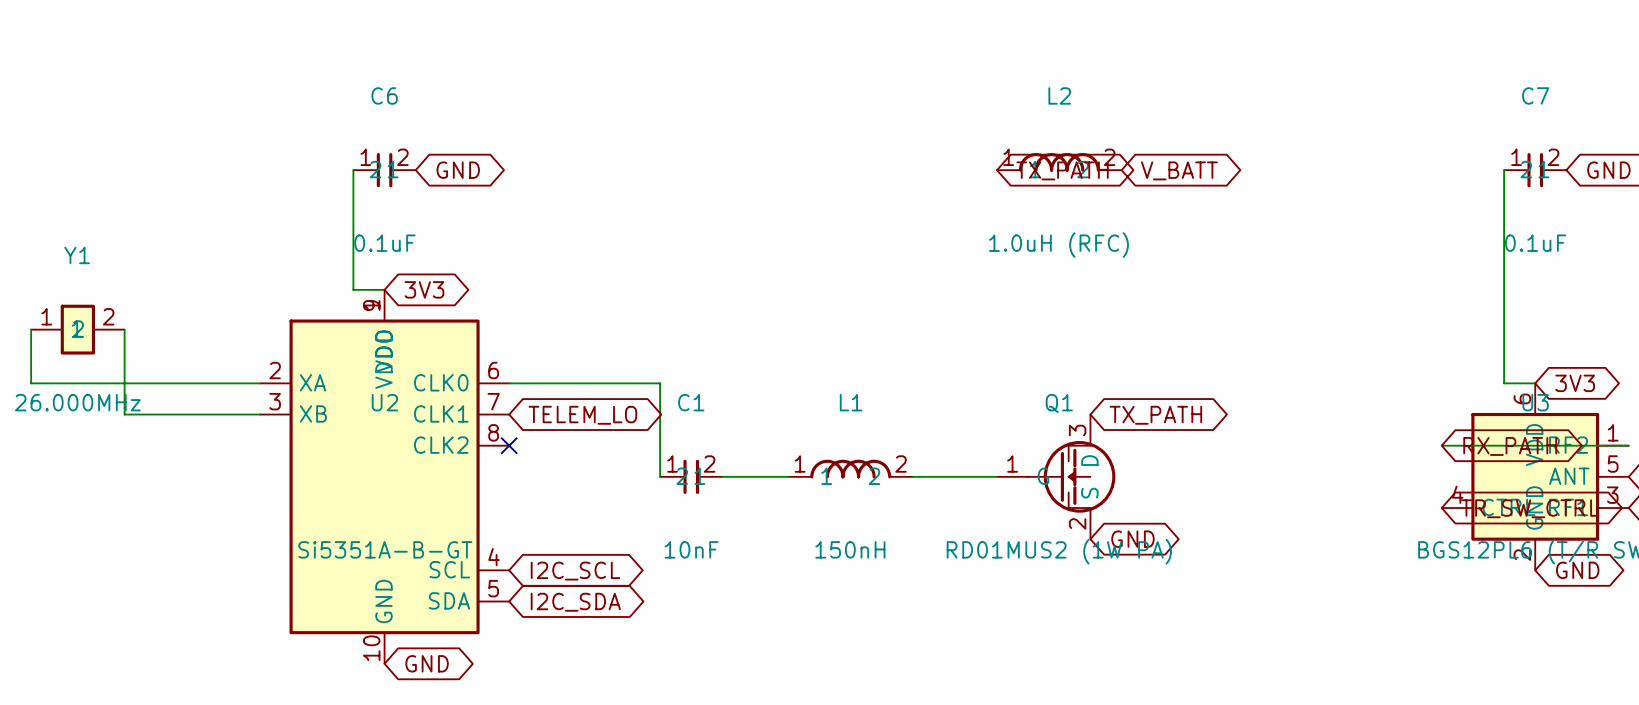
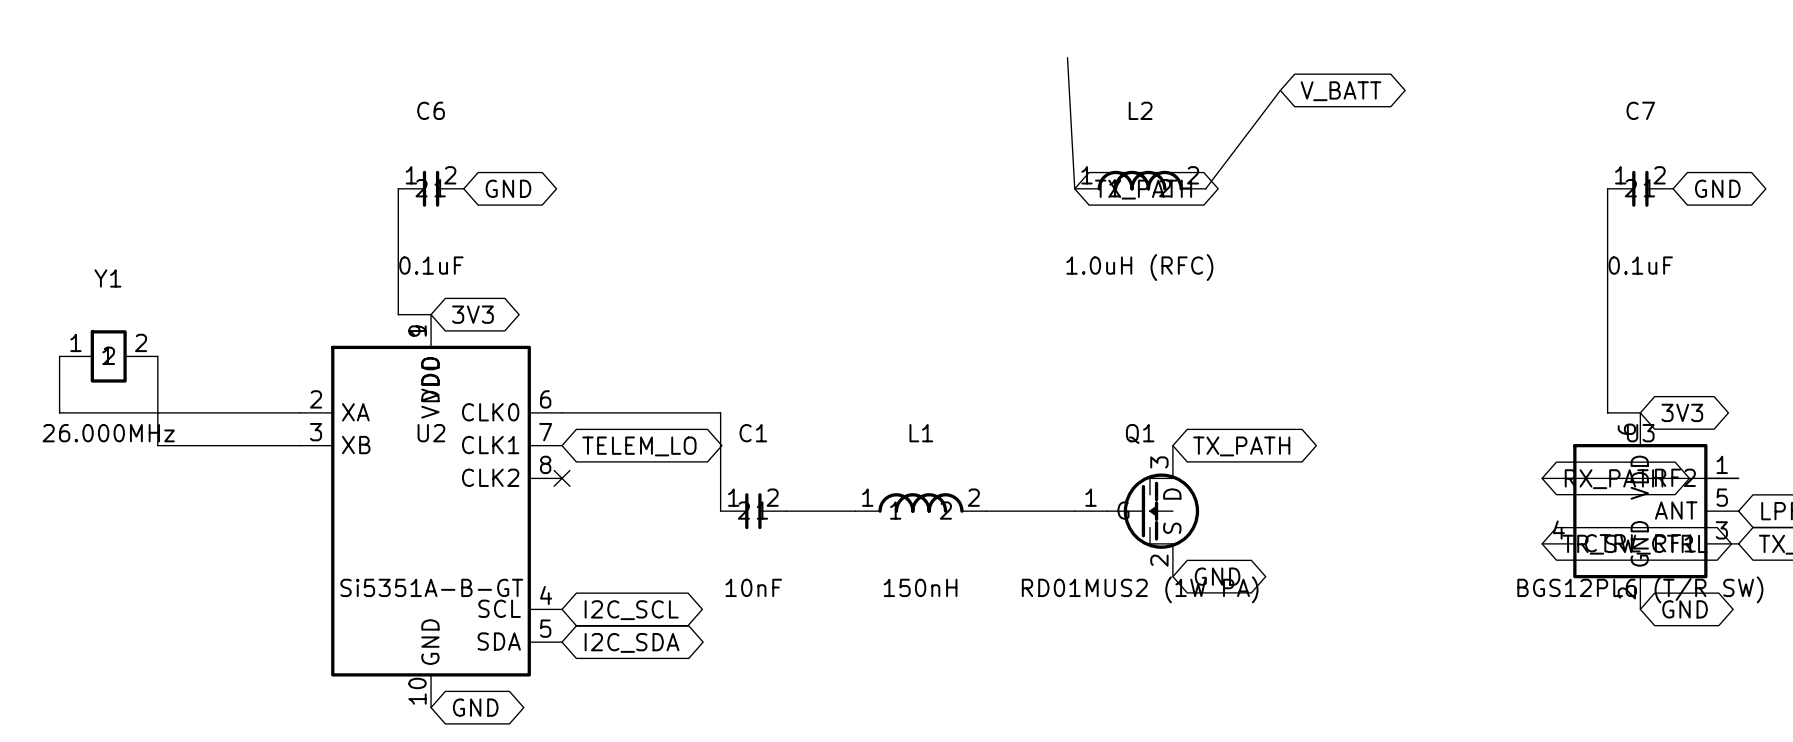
wire: none -> (1067, 57) (1074, 188)
wire: none -> (1280, 90) (1205, 188)
global label position: V_BATT (1179, 170) -> V_BATT (1341, 91)

